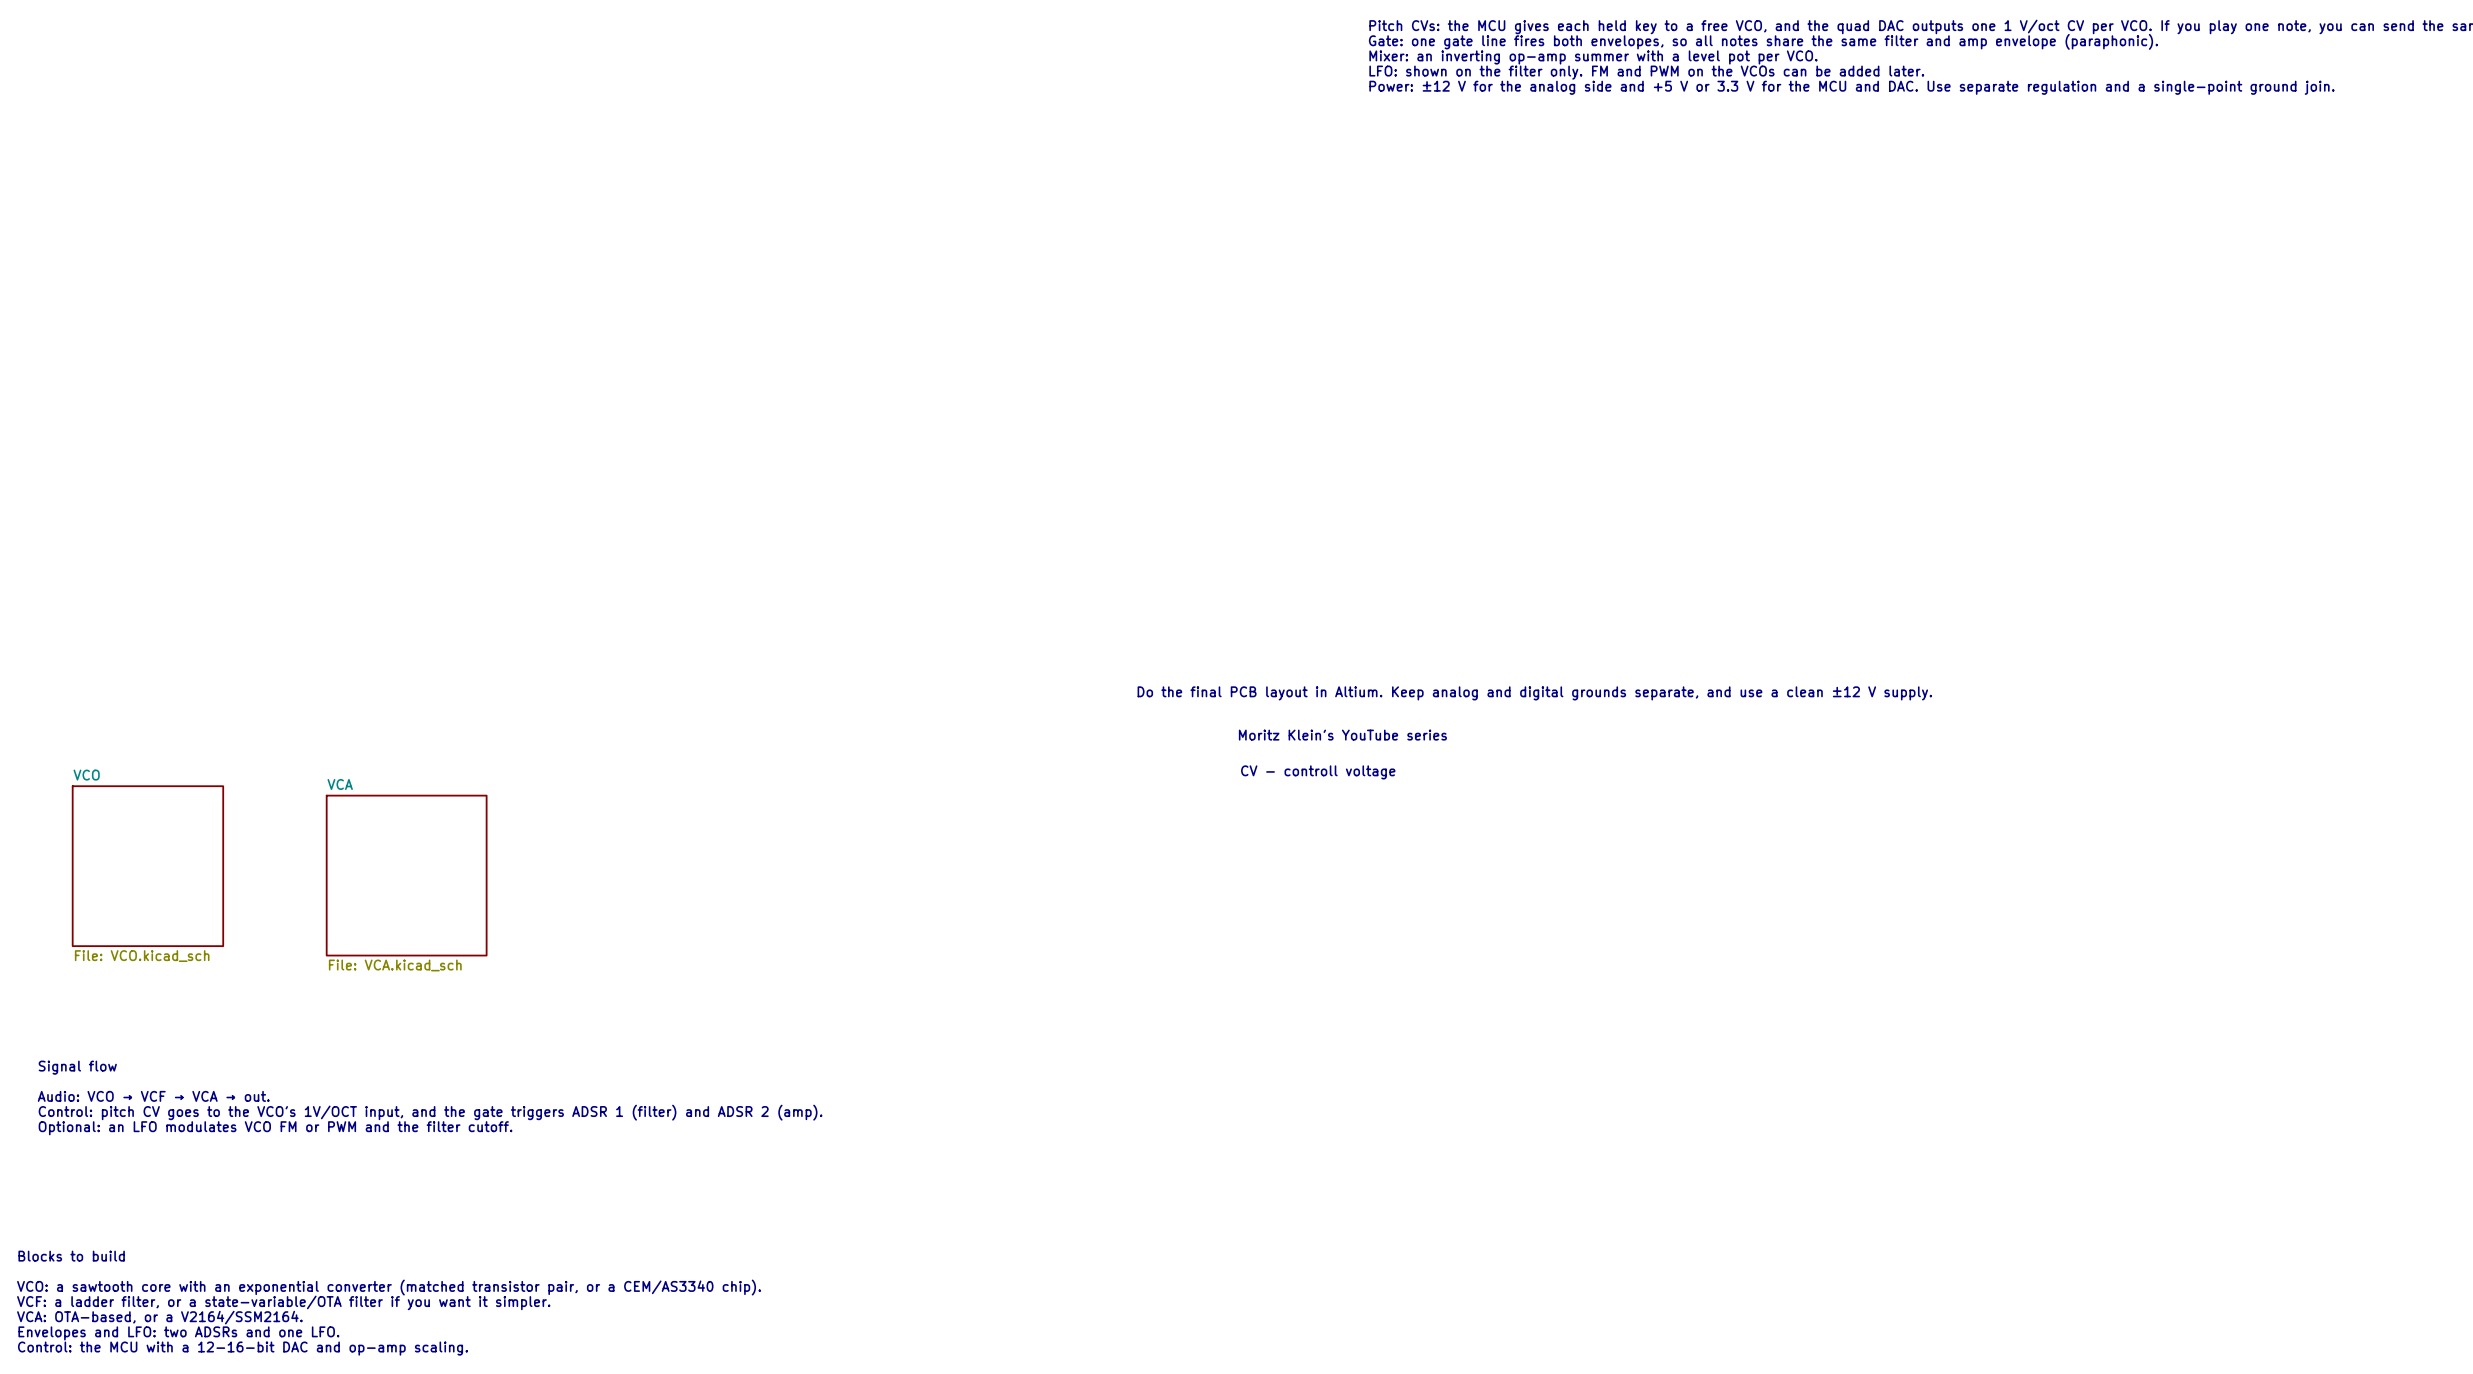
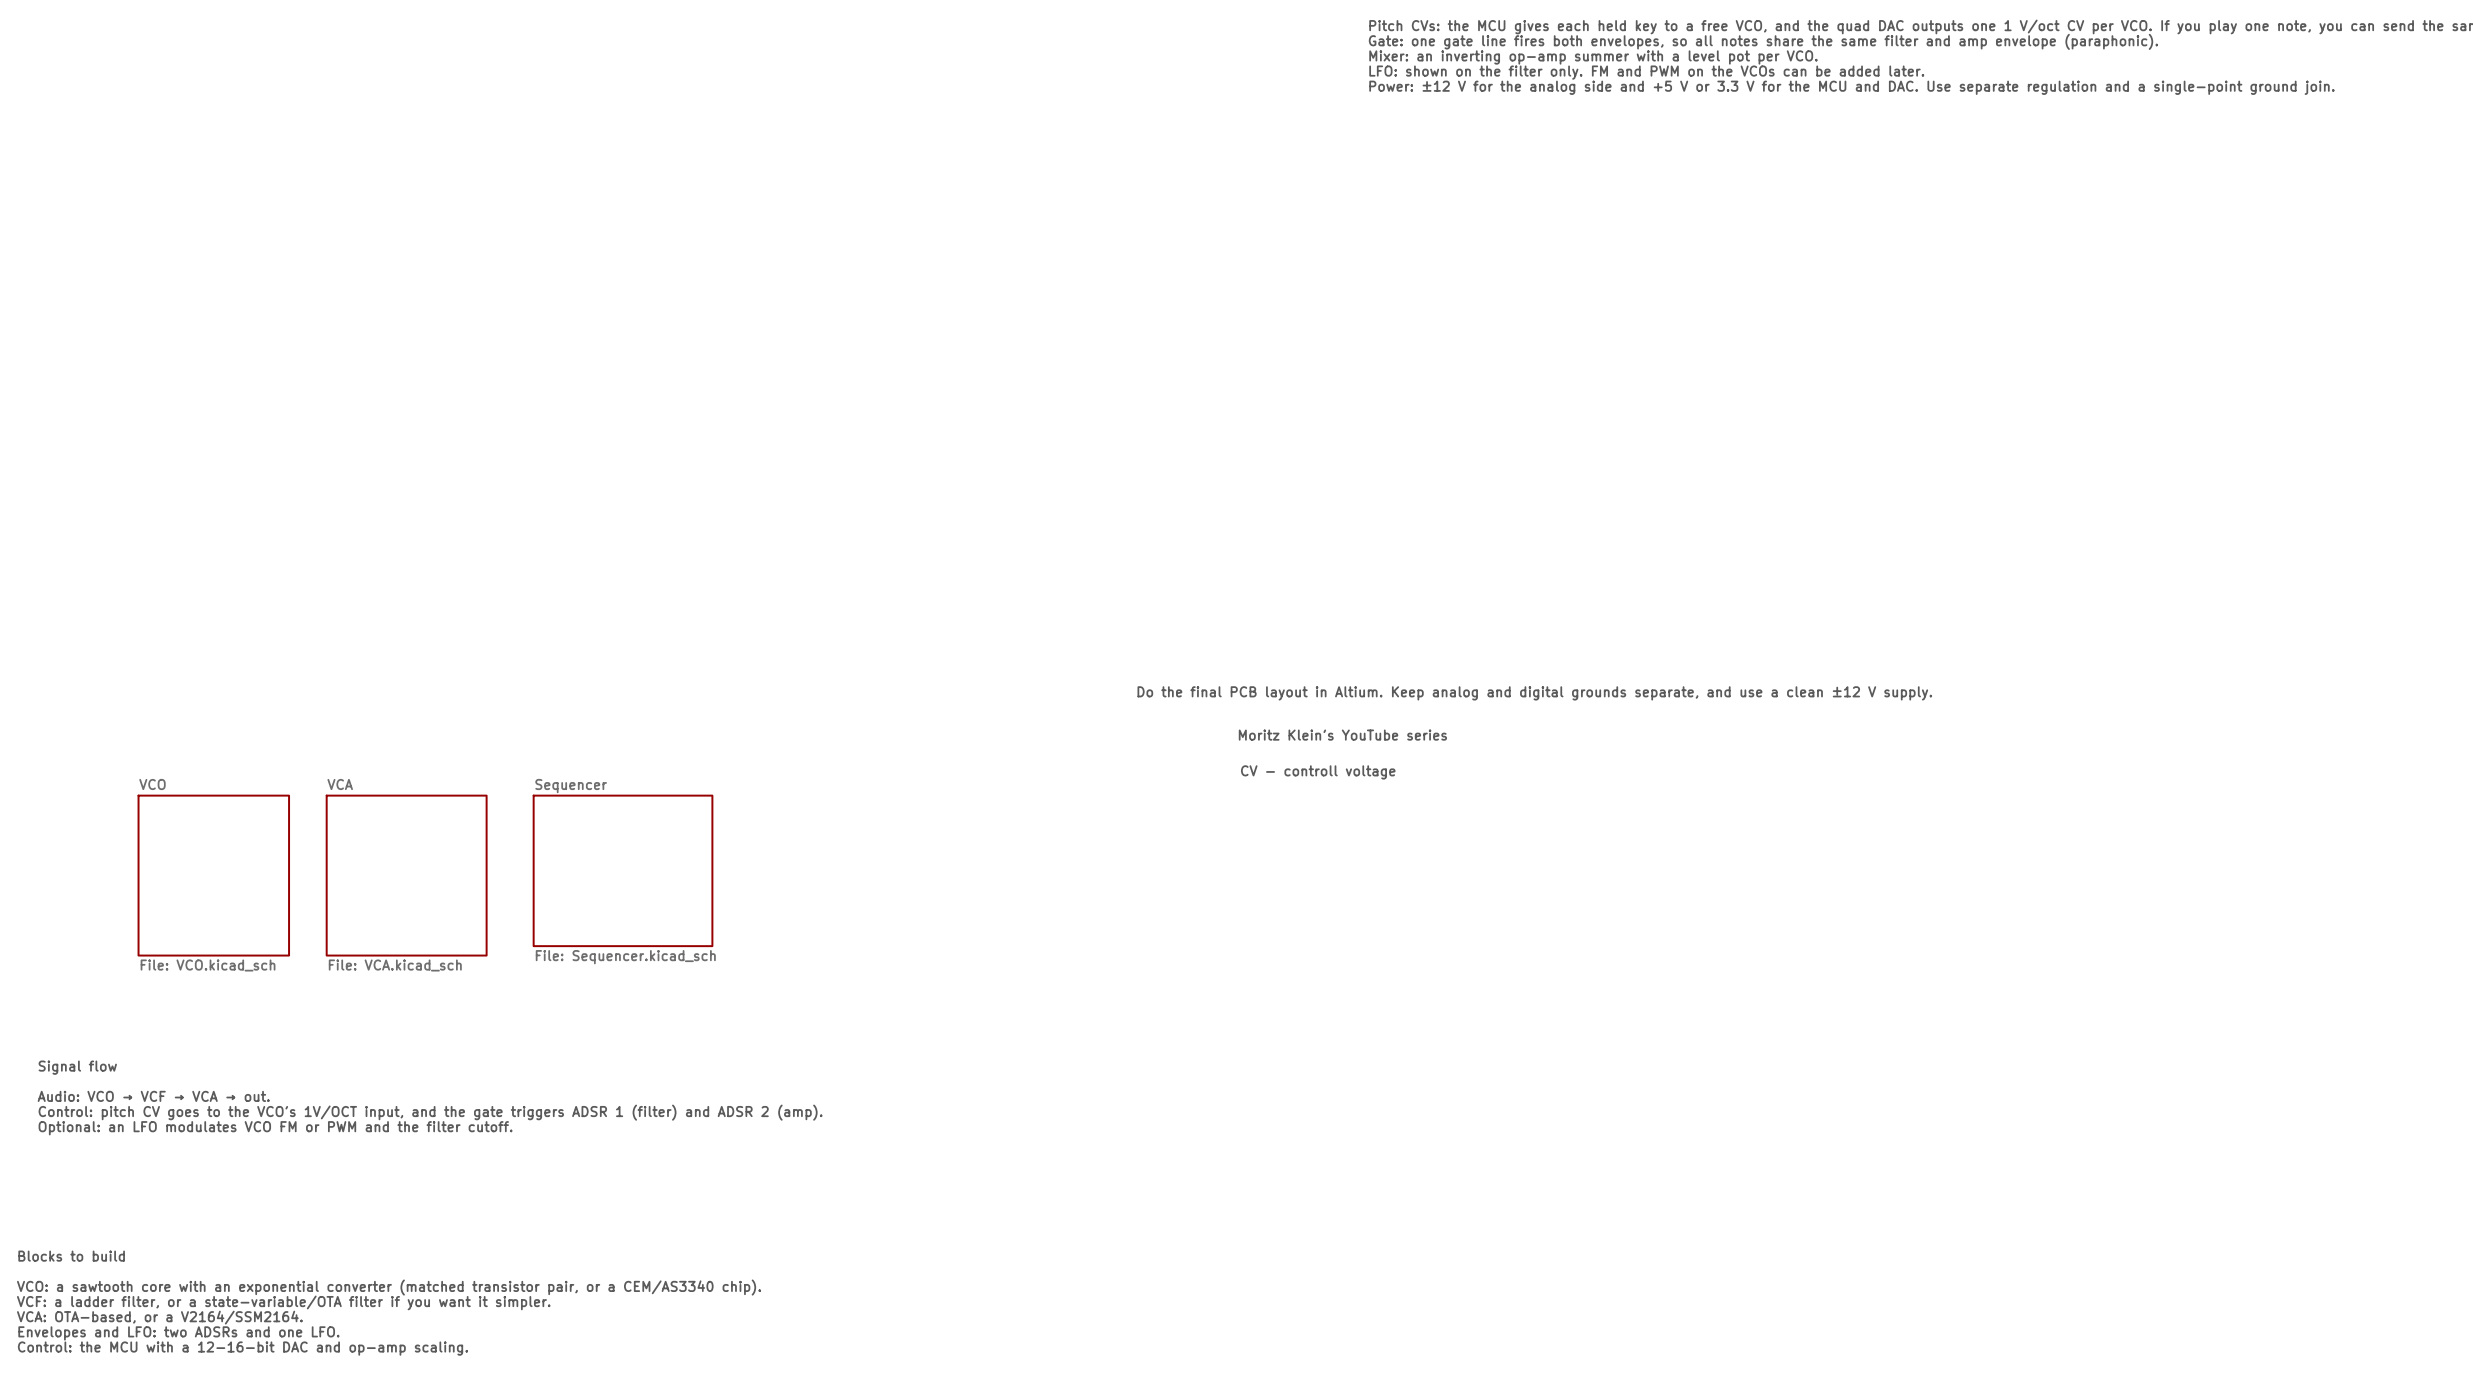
sheet VCO position: (147, 866) -> (213, 875)
sheet Sequencer: none -> File: Sequencer.kicad_sch (623, 870)

